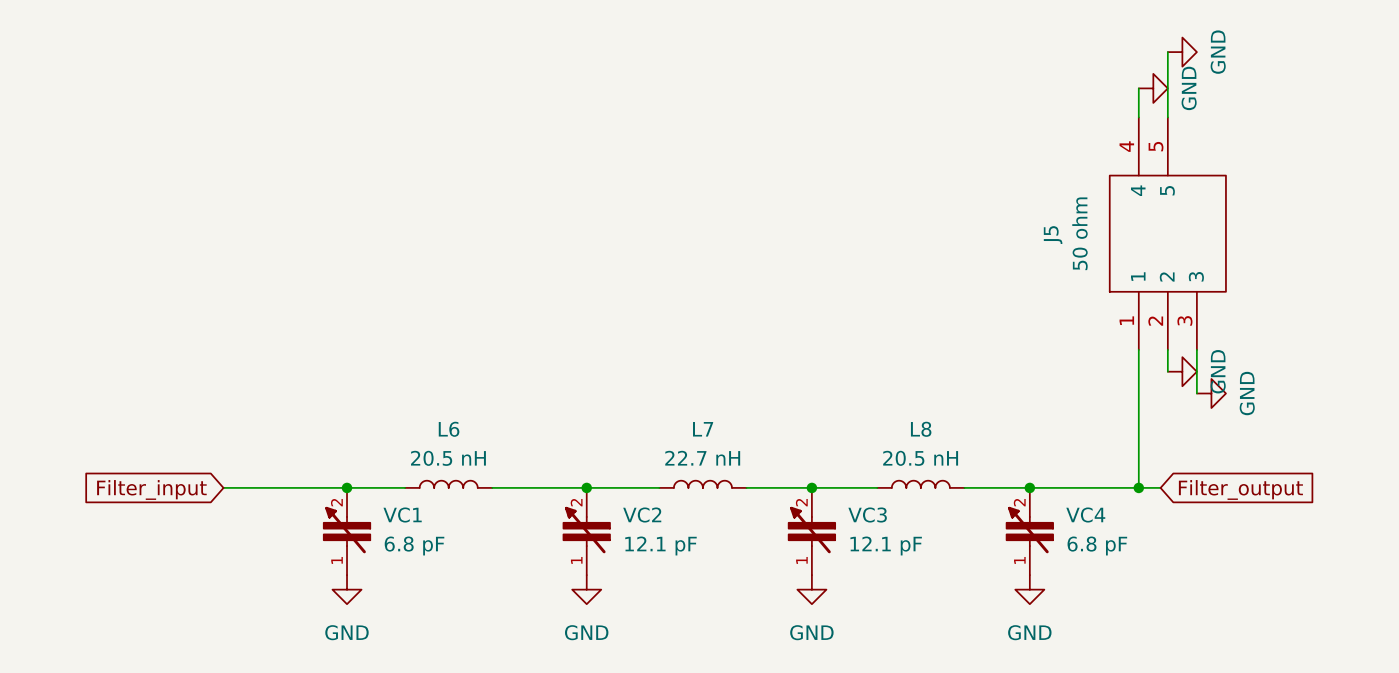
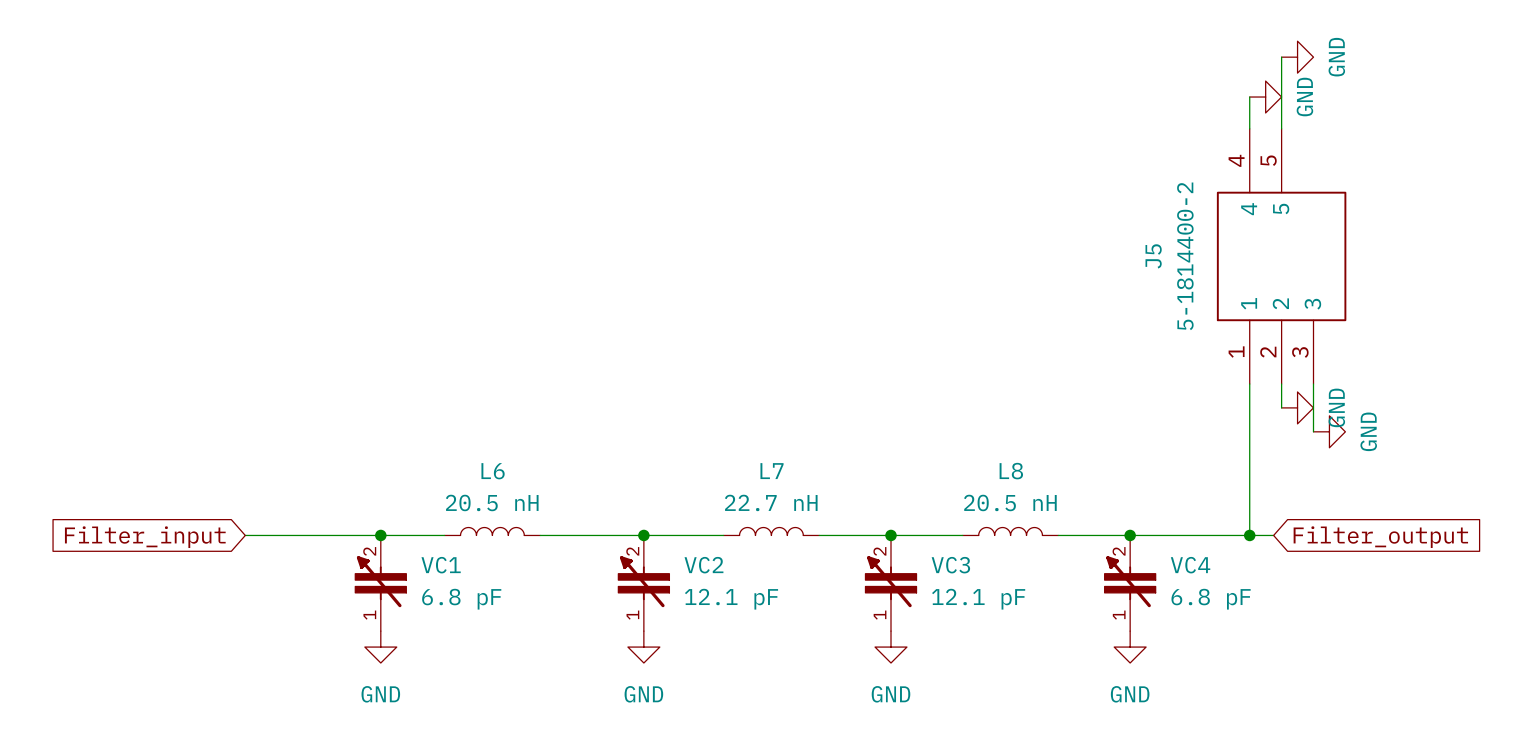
J5 value: 50 ohm (1079, 233) -> 5-1814400-2 (1185, 256)

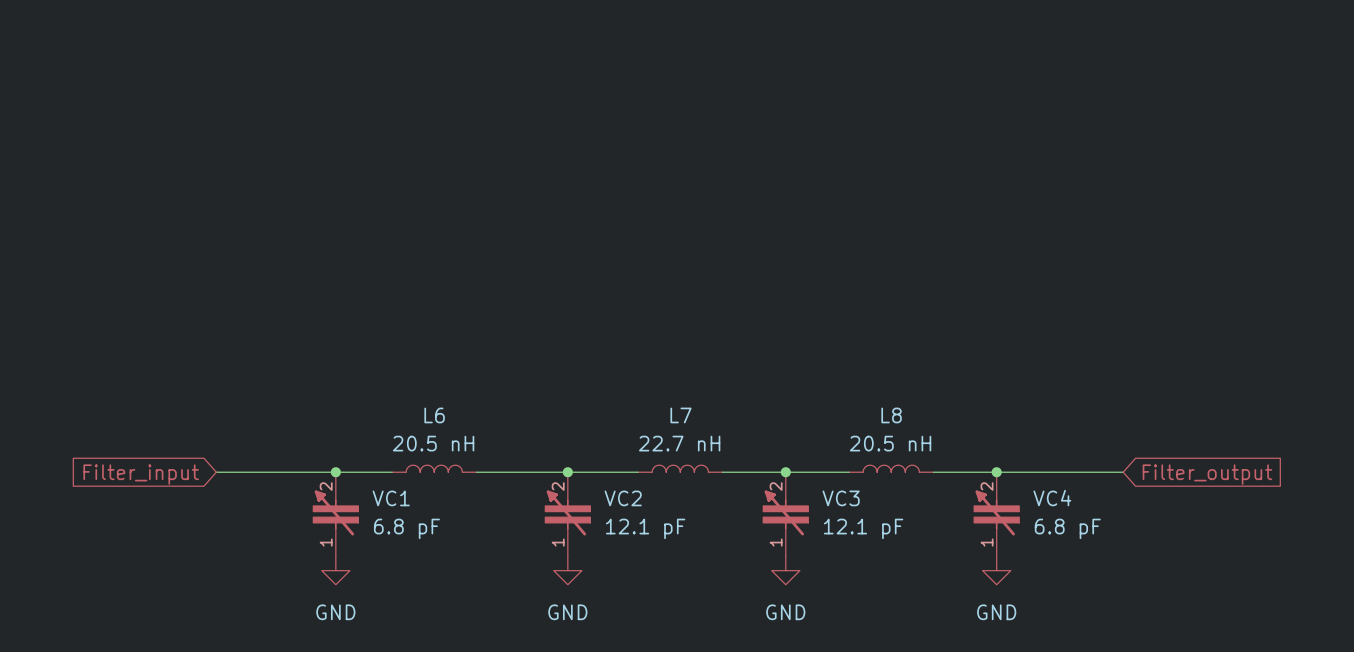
wire: (1281, 57) (1281, 128) -> none
power symbol: GND (1297, 57) -> none
wire: (1249, 97) (1249, 128) -> none
power symbol: GND (1265, 97) -> none
J5: 5-1814400-2 (1281, 256) -> none
wire: (1249, 384) (1249, 535) -> none
wire: (1281, 384) (1281, 407) -> none
wire: (1313, 384) (1313, 431) -> none
power symbol: GND (1297, 407) -> none
power symbol: GND (1329, 431) -> none
junction: (1249, 535) -> none

